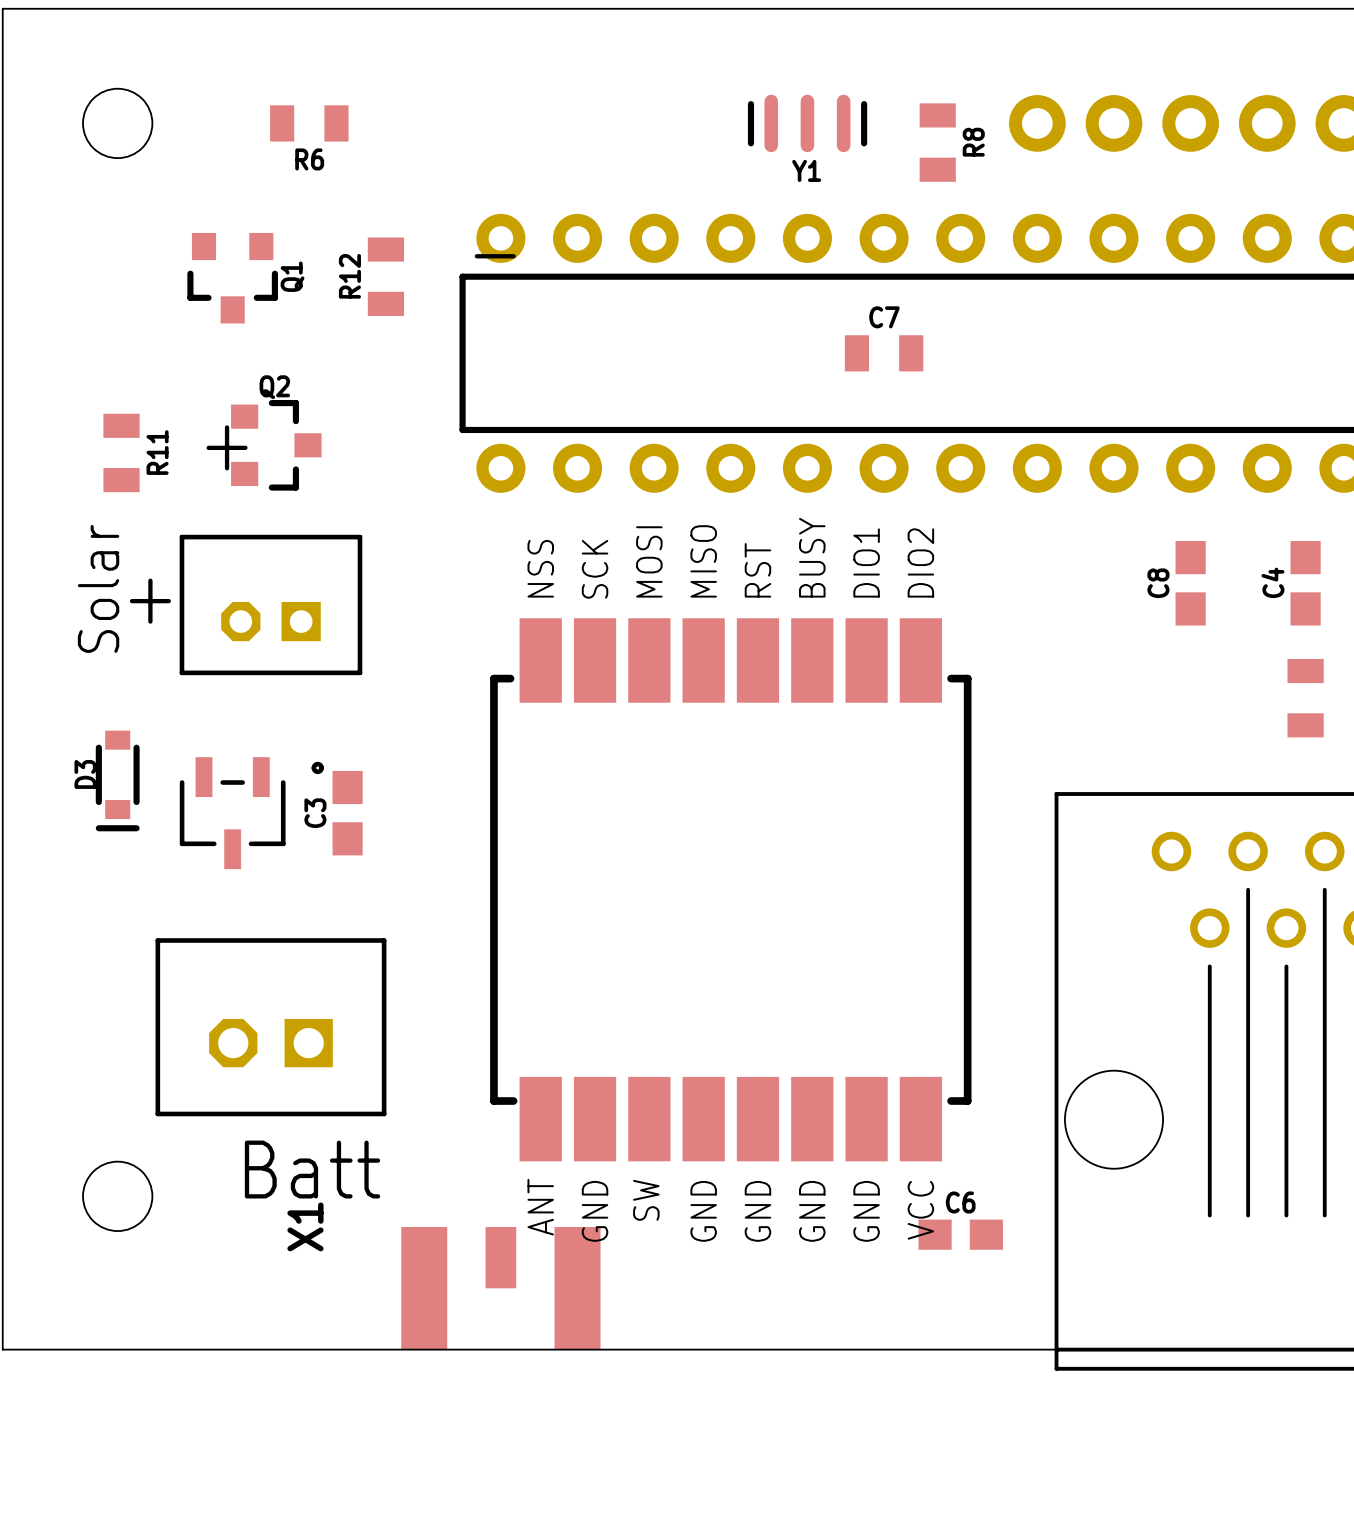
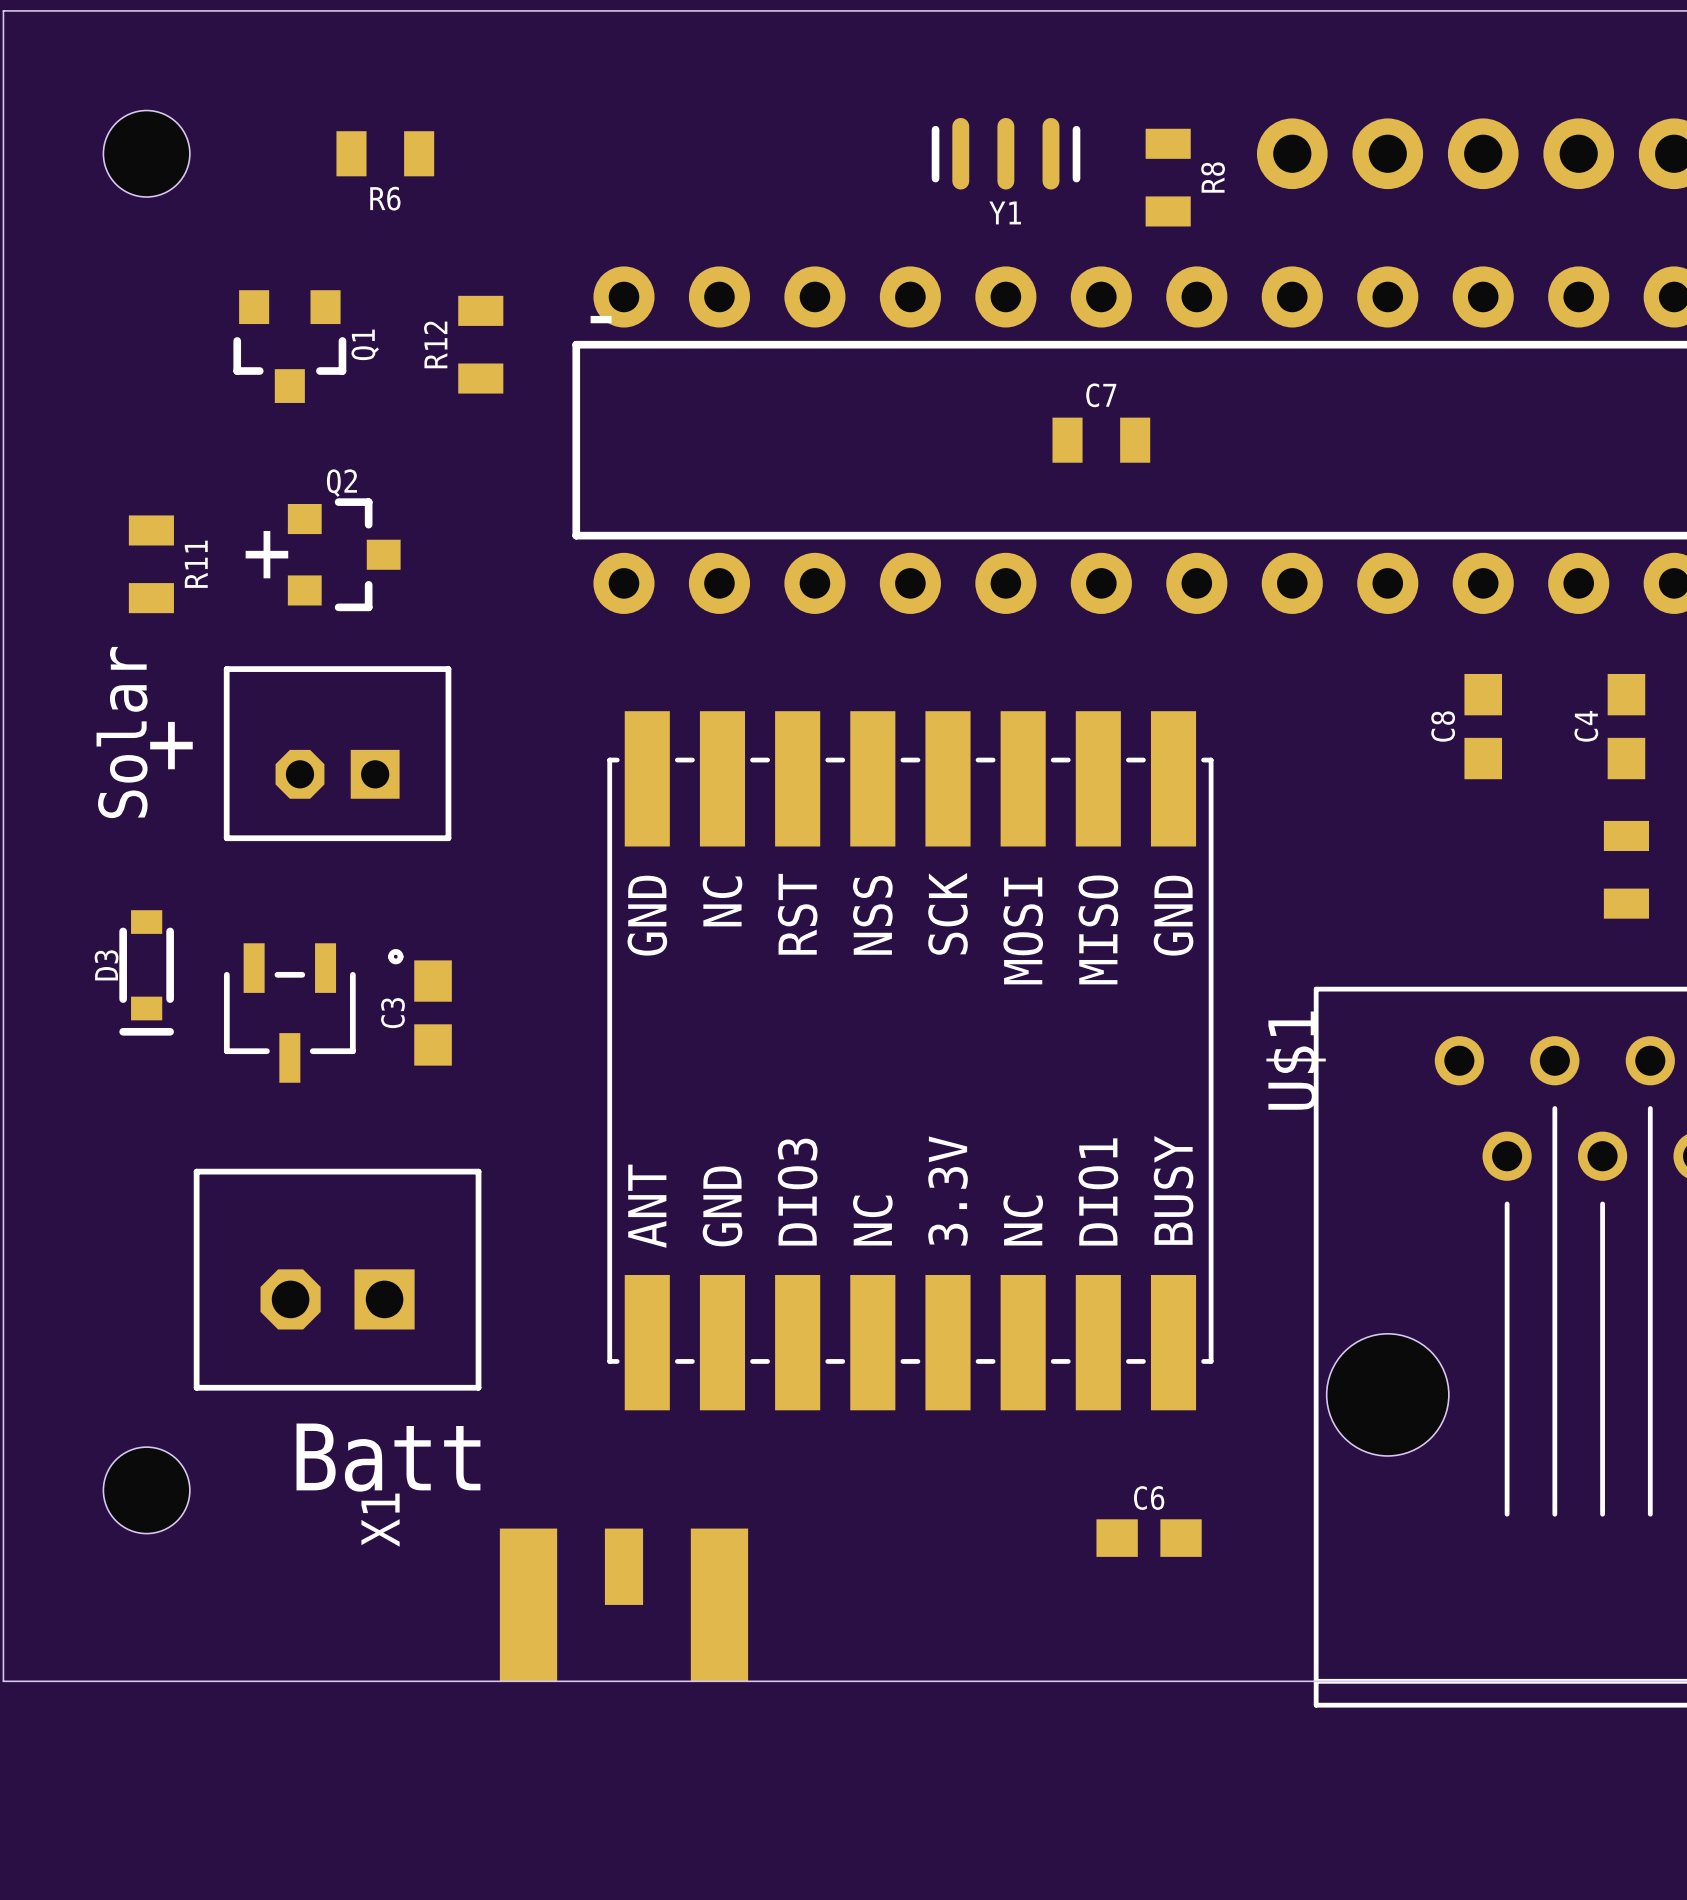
U$1: none -> (910, 1060)
part: (730, 889) -> none
C6 position: (960, 1234) -> (1149, 1538)

